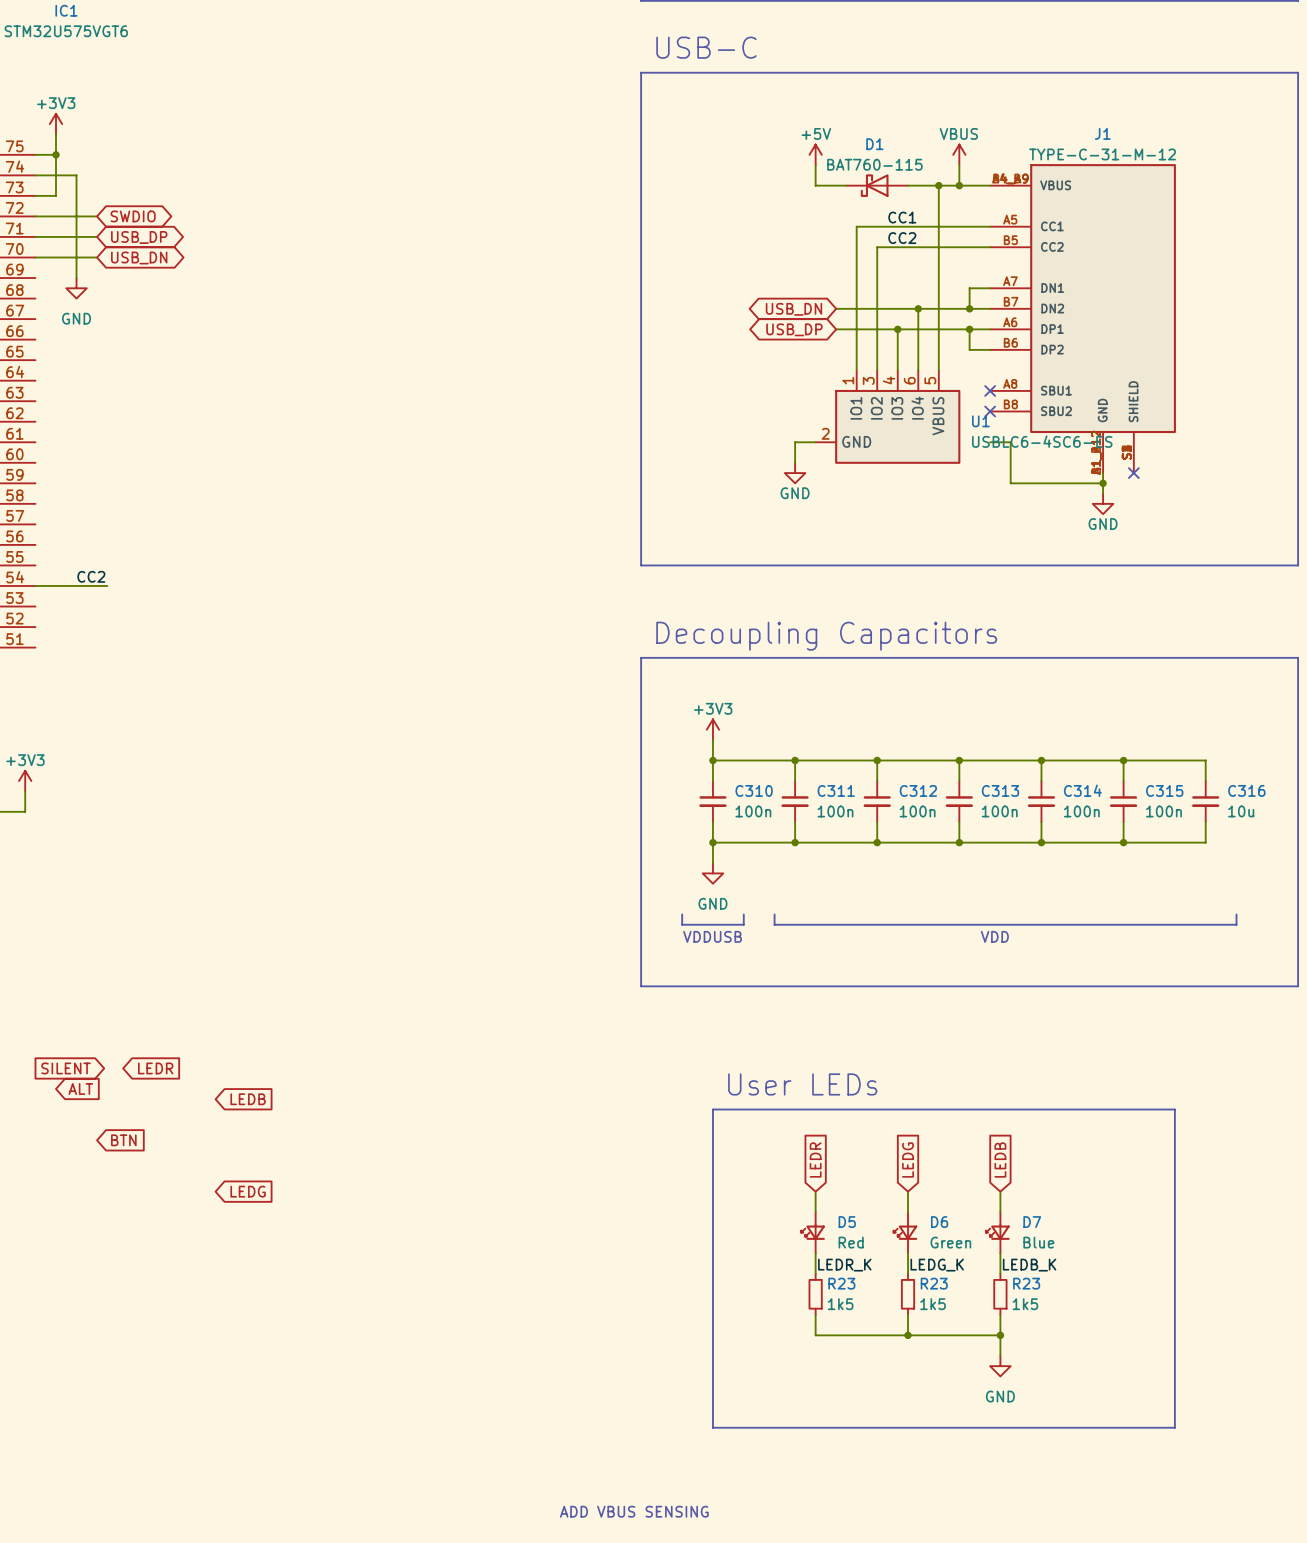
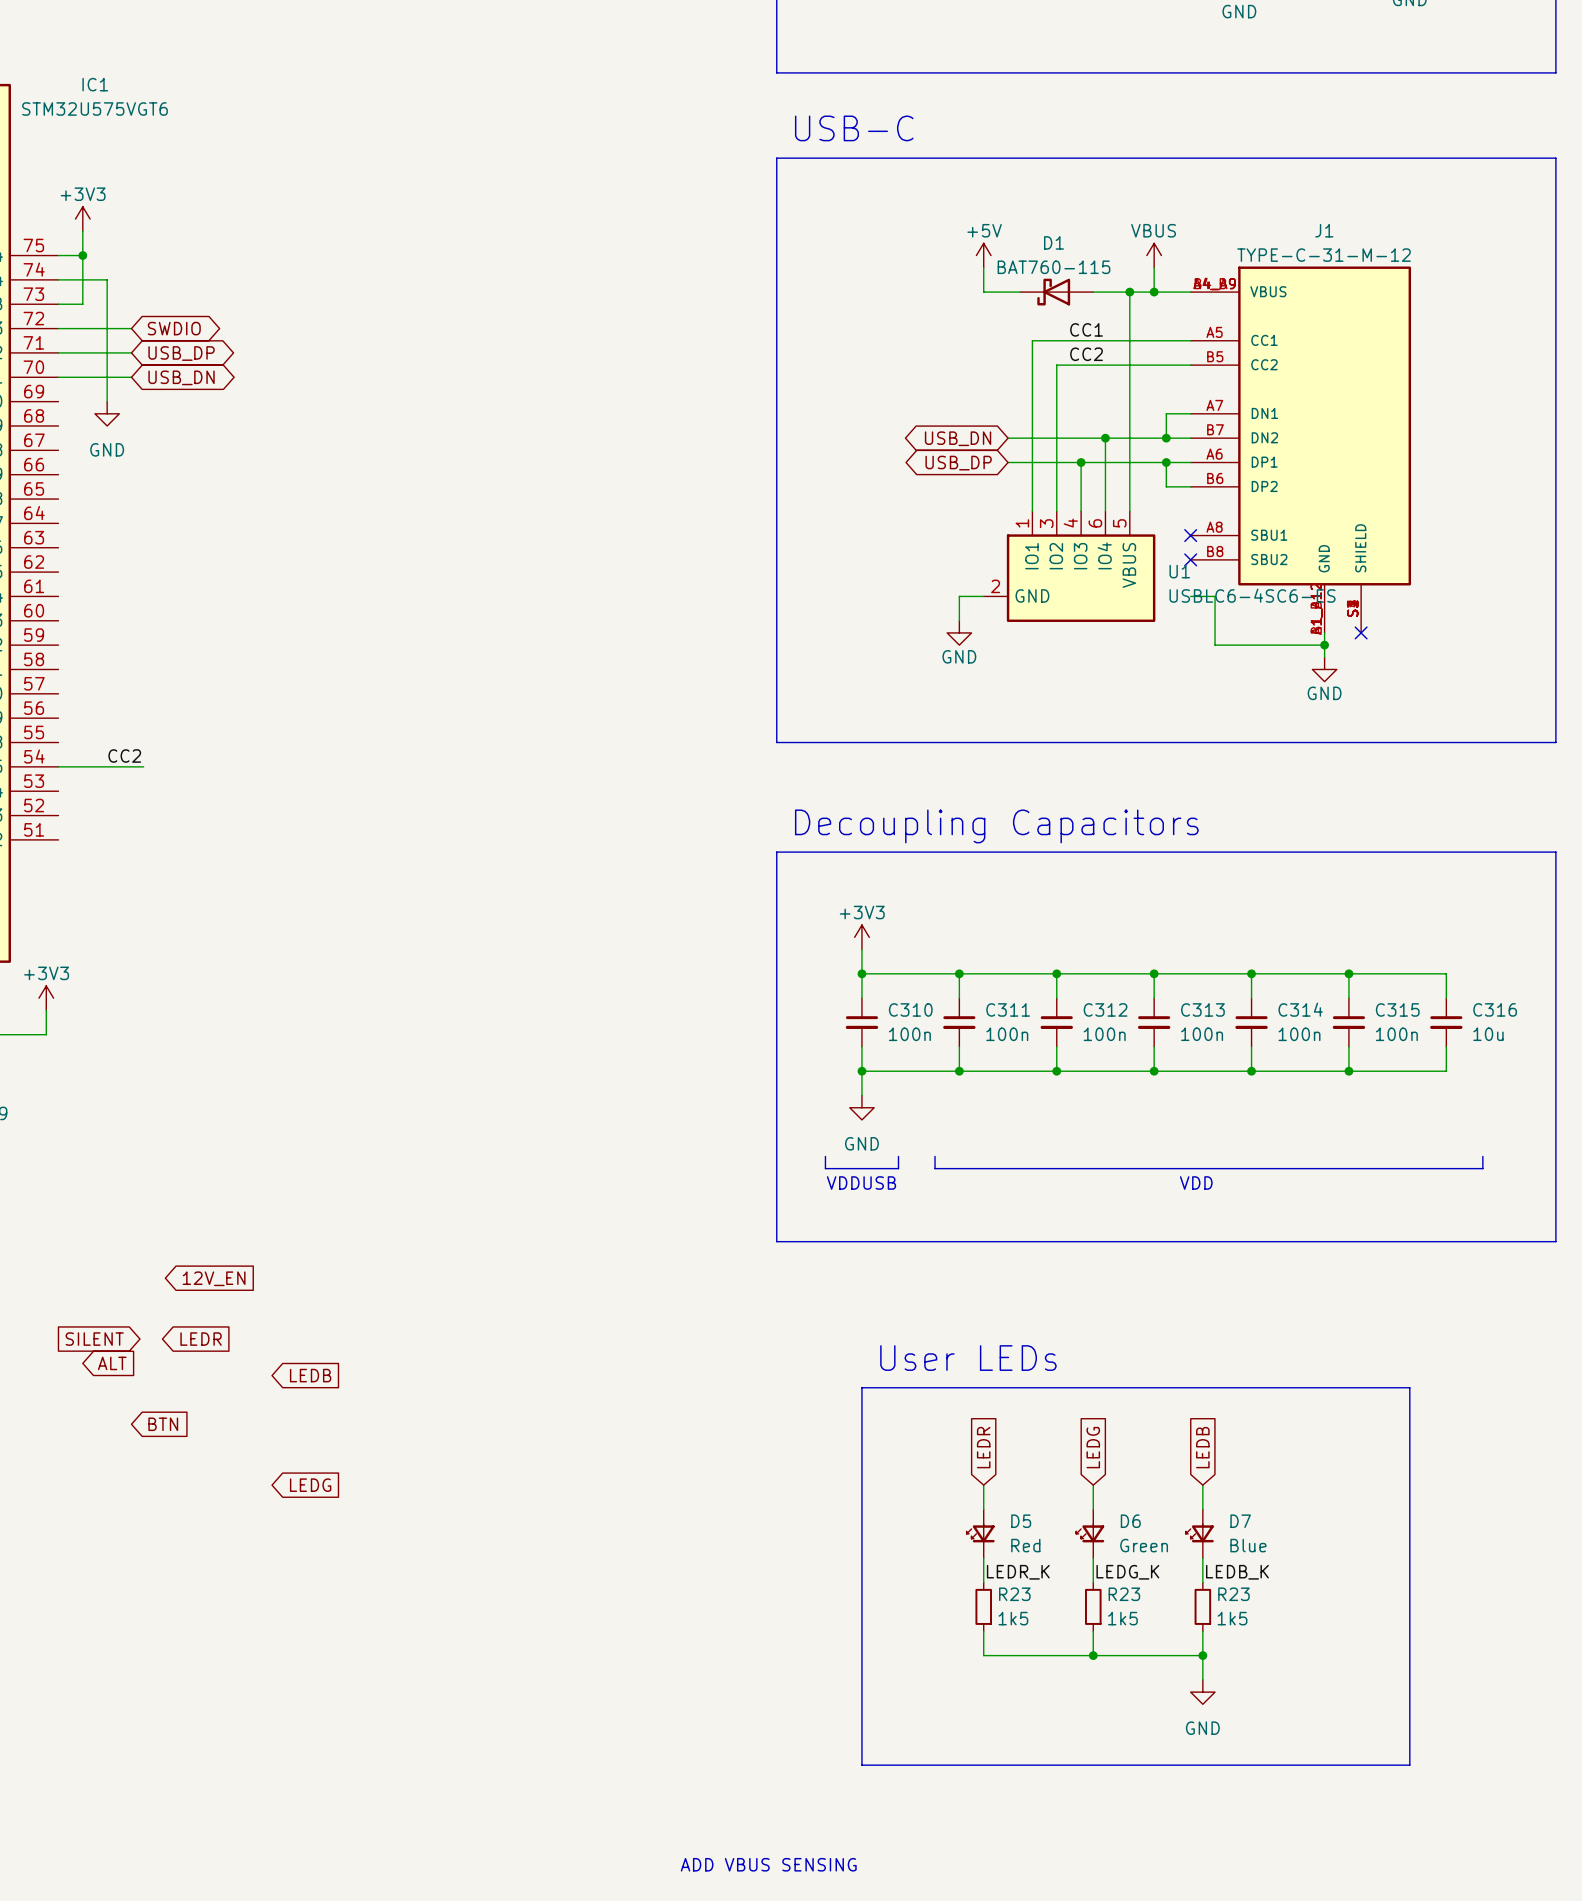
global label: none -> 12V_EN (214, 1278)

